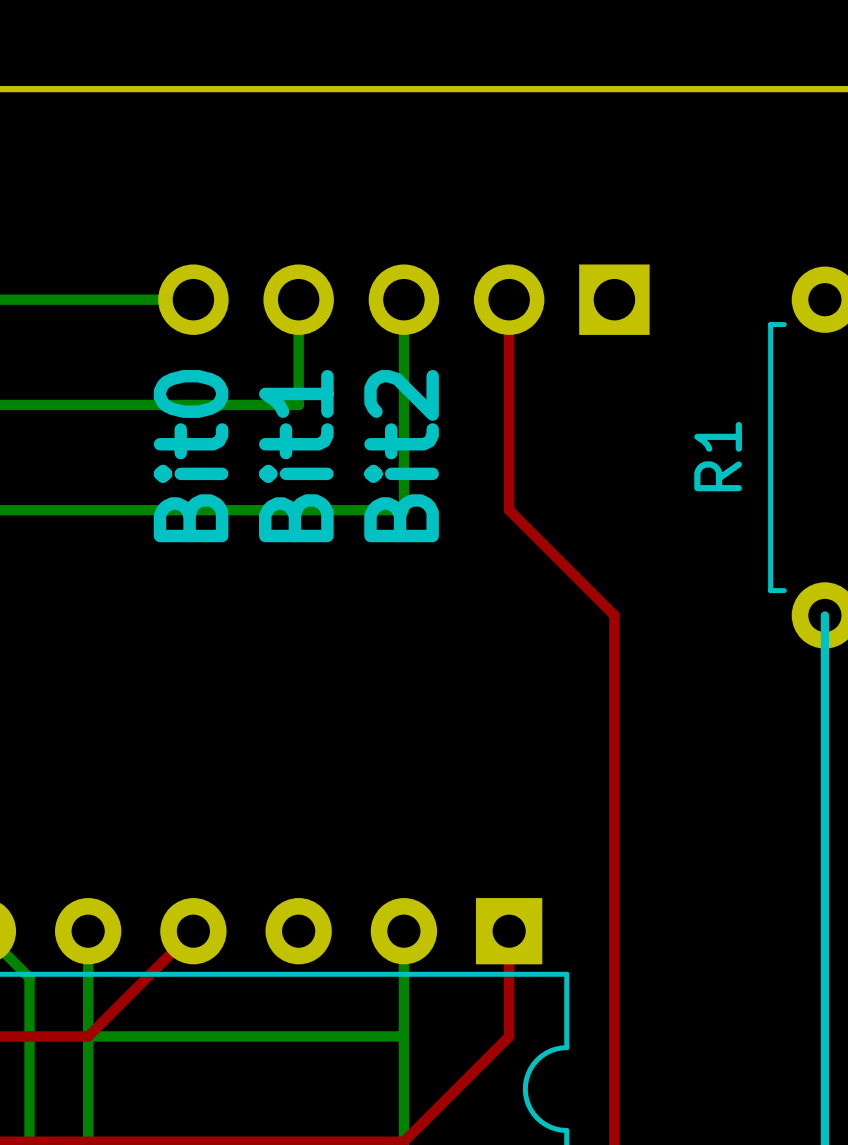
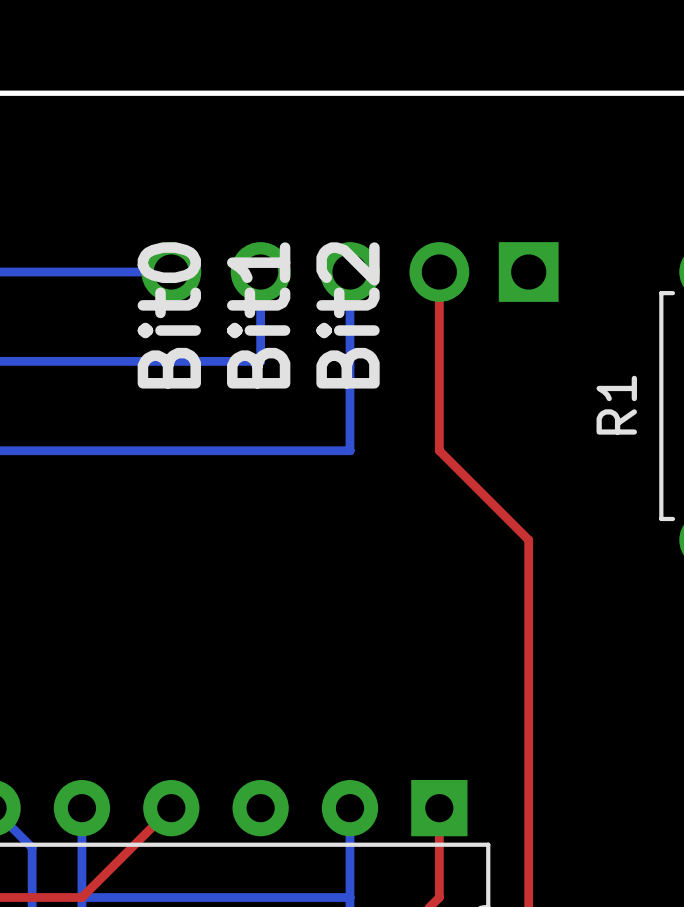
text position: Bit0 (191, 456) -> Bit0 (169, 315)
text position: Bit1 (296, 456) -> Bit1 (258, 315)
text position: Bit2 (401, 456) -> Bit2 (348, 315)

